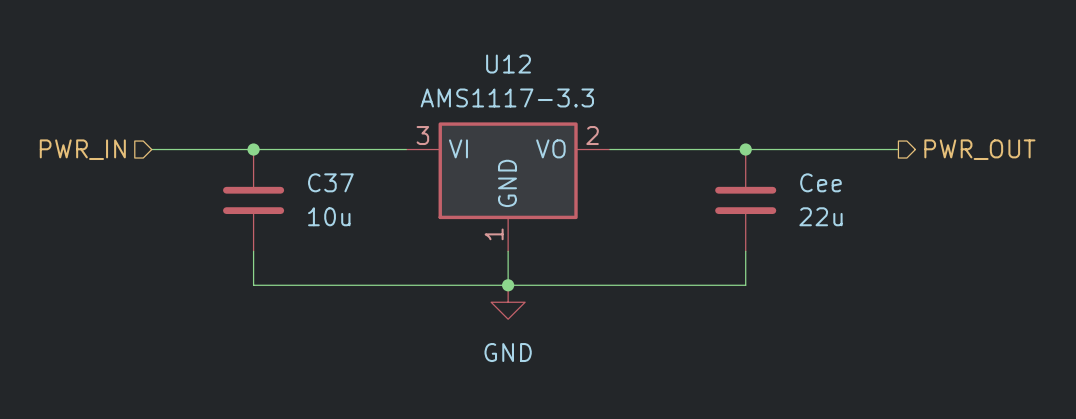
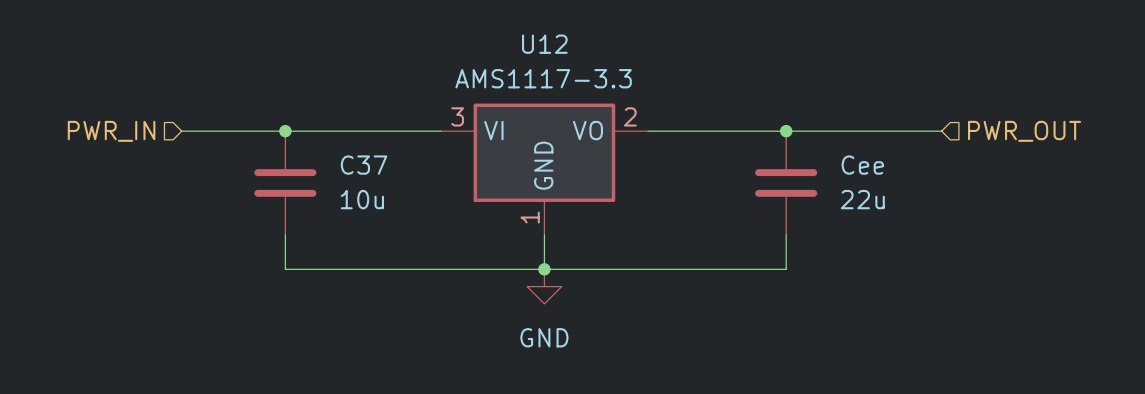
hierarchical label shape: output (979, 149) -> input (1024, 131)

